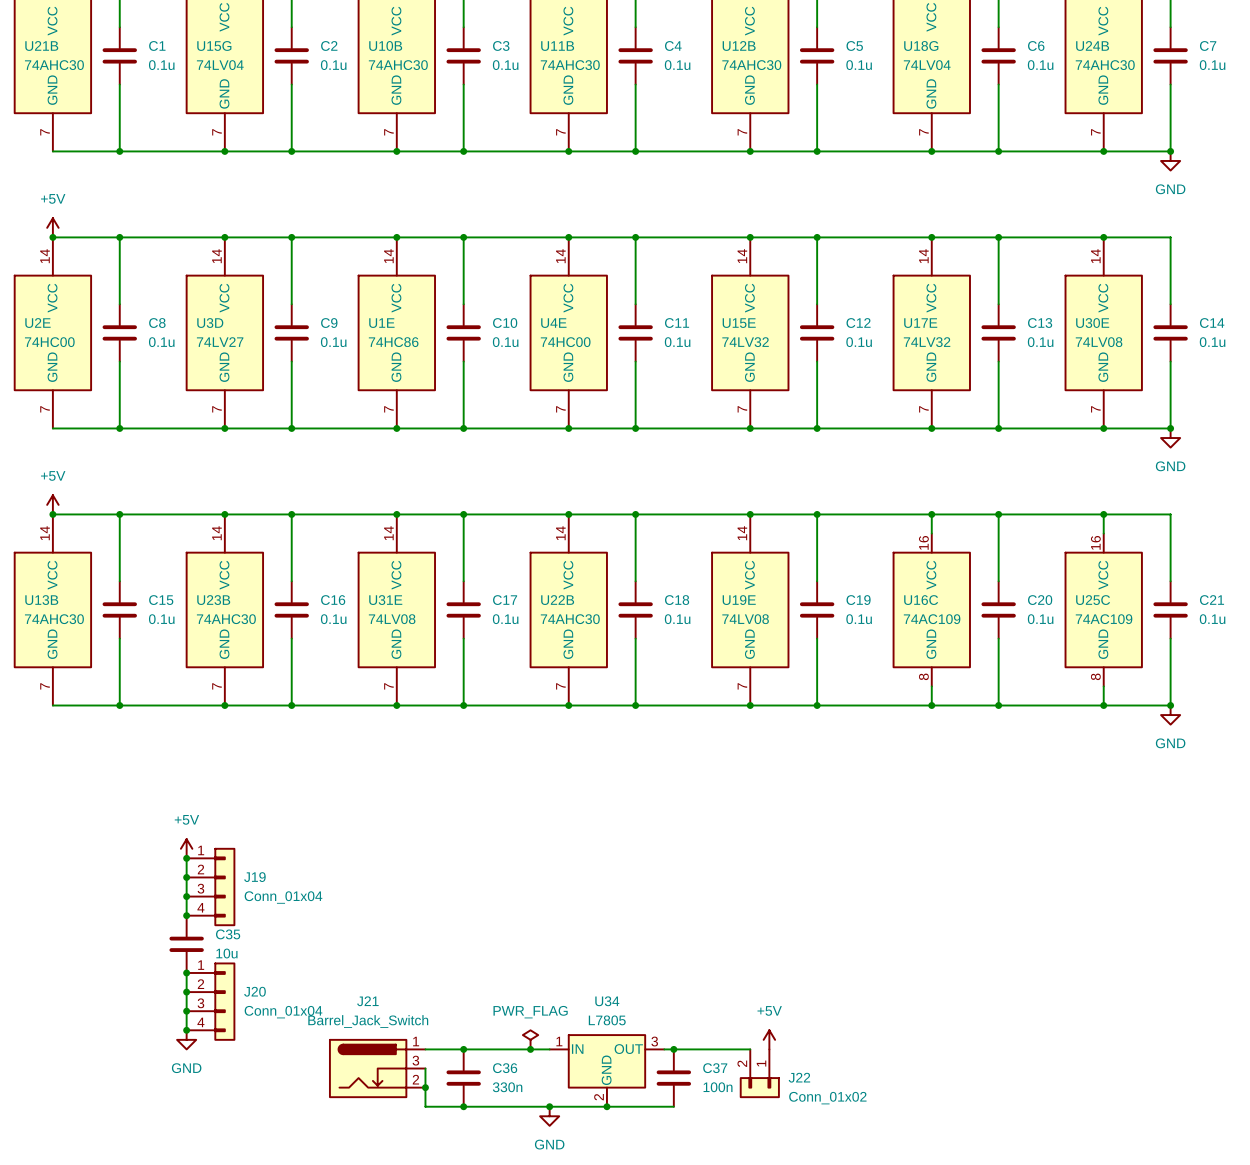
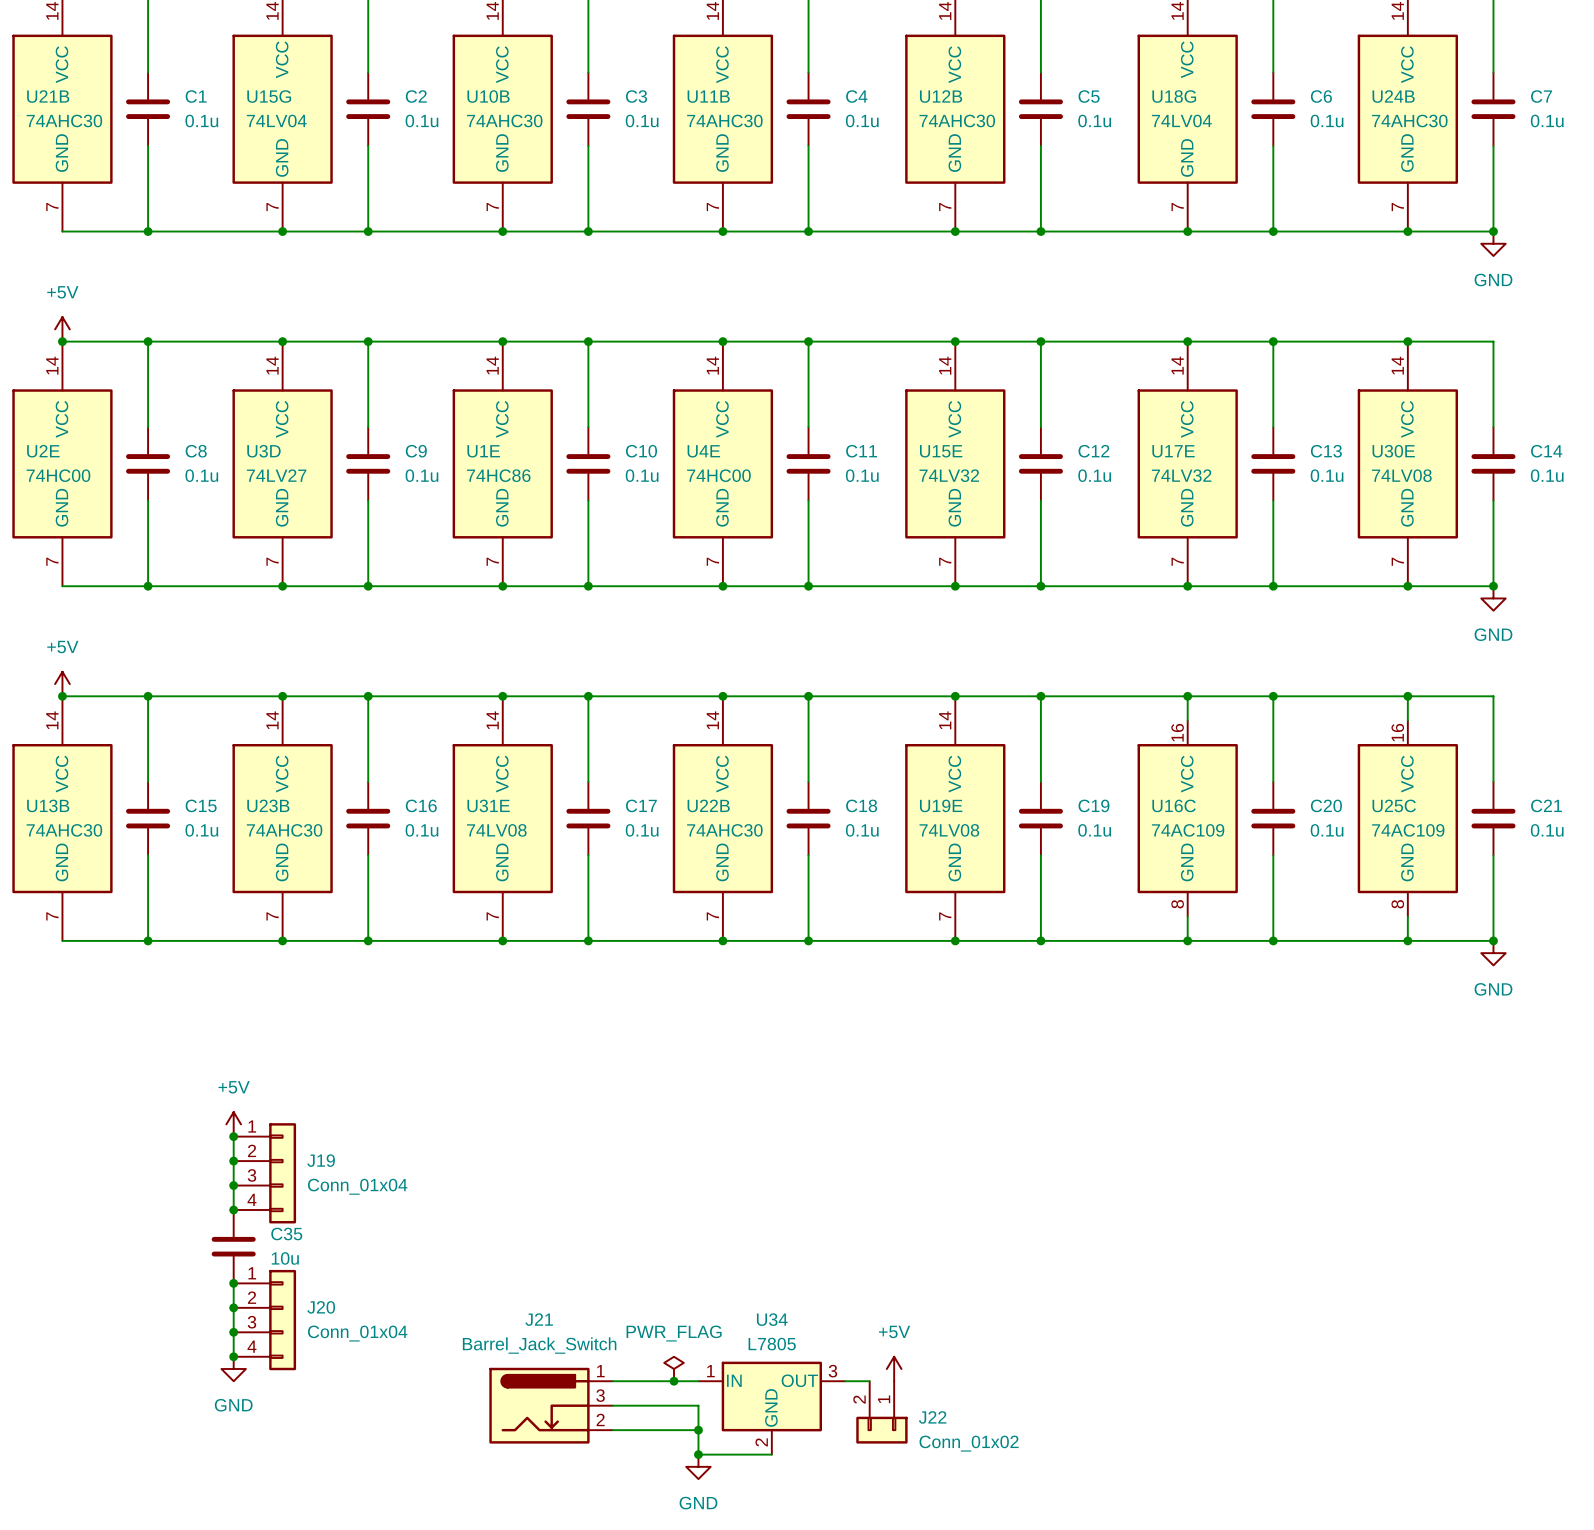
power symbol position: +5V (769, 1039) -> +5V (894, 1369)
junction: (463, 1049) -> none
junction: (673, 1049) -> none
wire: (683, 1049) (750, 1049) -> none
J21 position: (377, 1068) -> (551, 1405)
wire: (425, 1068) (425, 1106) (549, 1106) -> (612, 1405) (698, 1405) (698, 1454)
J22 position: (759, 1073) -> (881, 1412)
C36: 330n (463, 1078) -> none
C37: 100n (673, 1078) -> none
junction: (425, 1087) -> none
junction: none -> (698, 1430)
junction: (463, 1106) -> none
wire: (606, 1106) (673, 1106) -> (612, 1430) (698, 1430)
junction: (606, 1106) -> none

